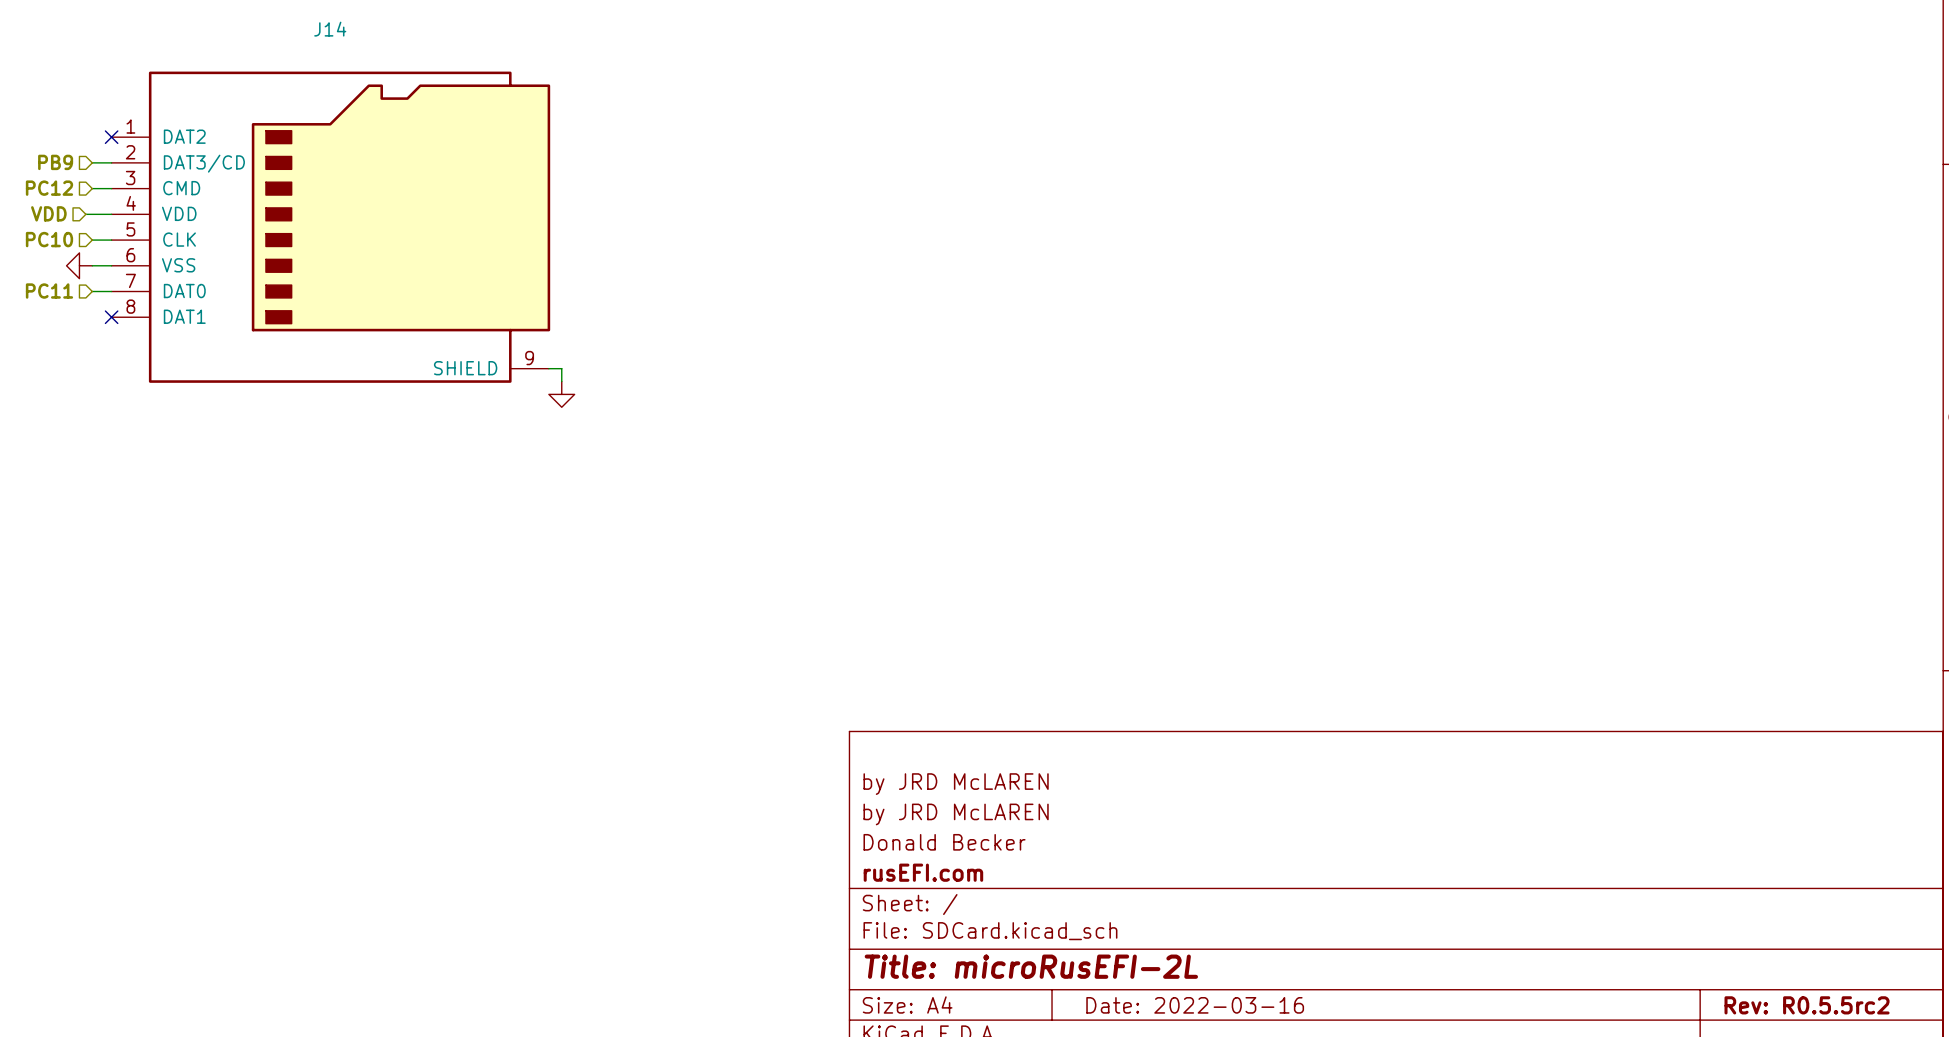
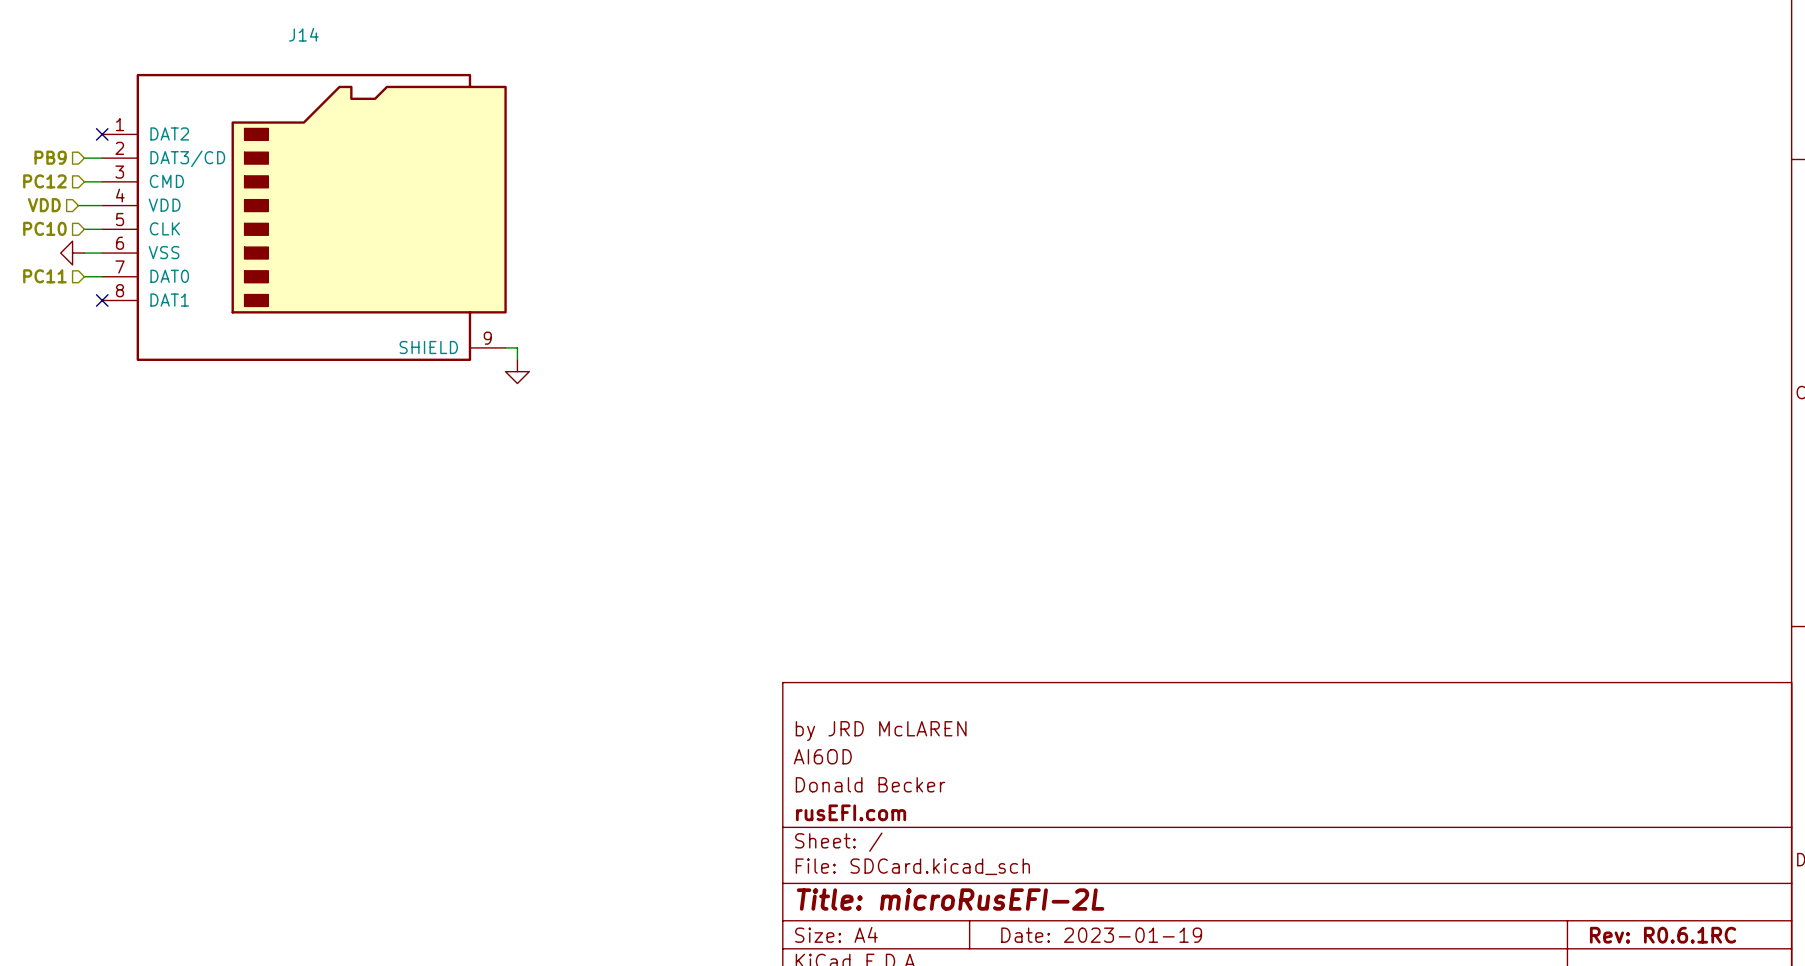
title block: by JRD McLAREN (956, 814) -> AI6OD (822, 756)
title block: Date: 2022-03-16 (1195, 1005) -> Date: 2023-01-19 (1101, 935)
title block: Rev: R0.5.5rc2 (1807, 1005) -> Rev: R0.6.1RC (1663, 935)

